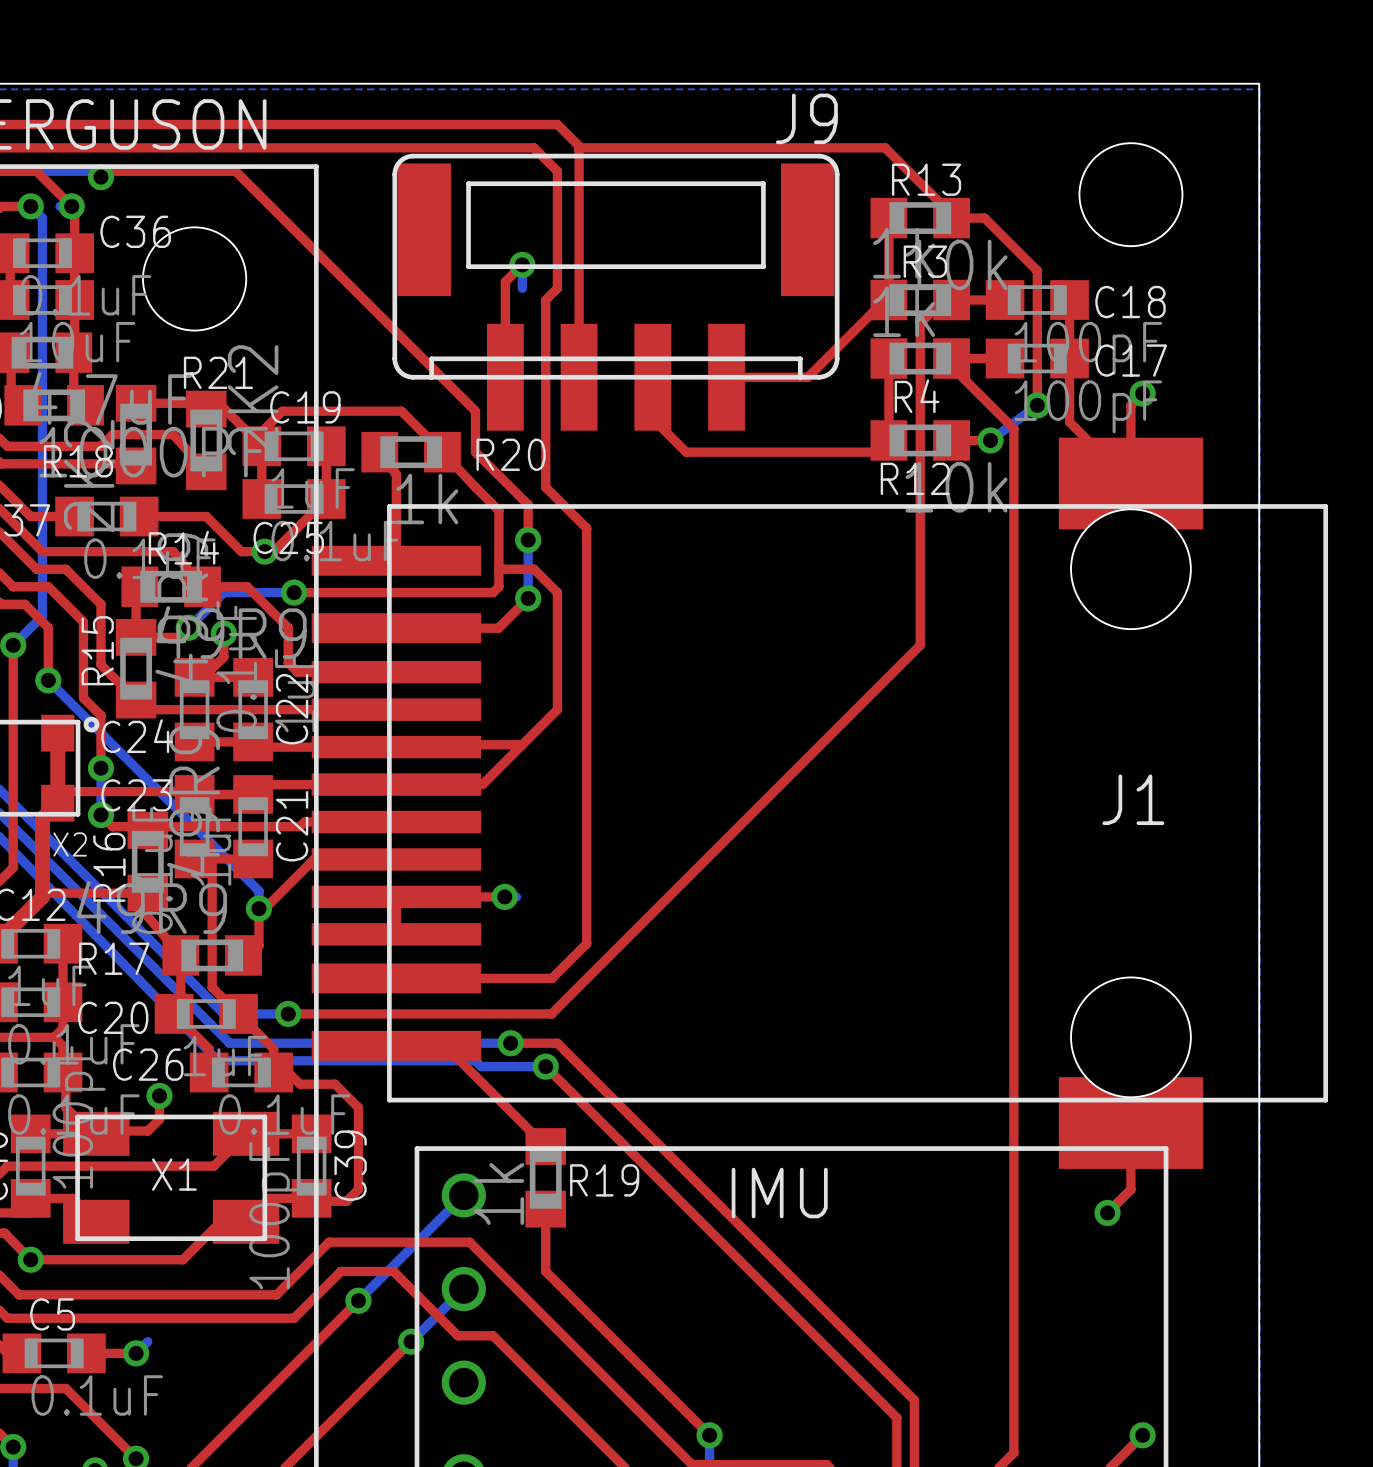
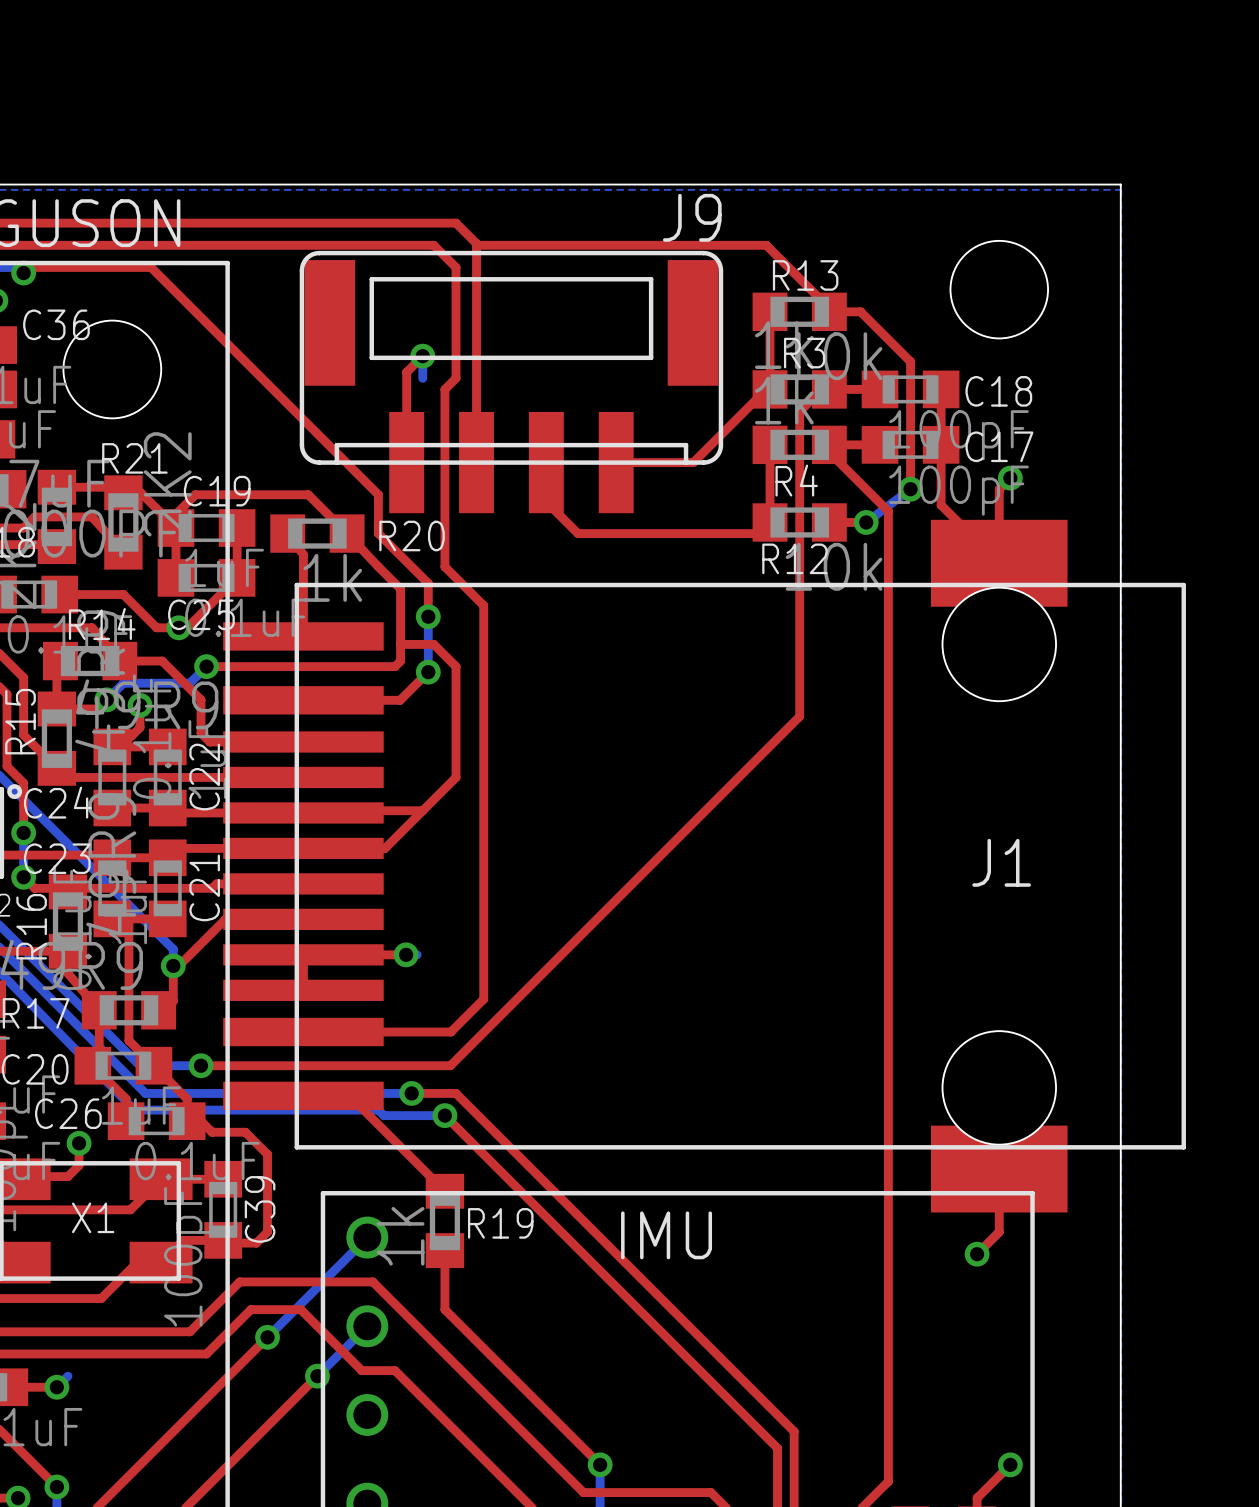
bottom track: (294, 592) (223, 592) (206, 610) -> (206, 666) (189, 683) (123, 683)

